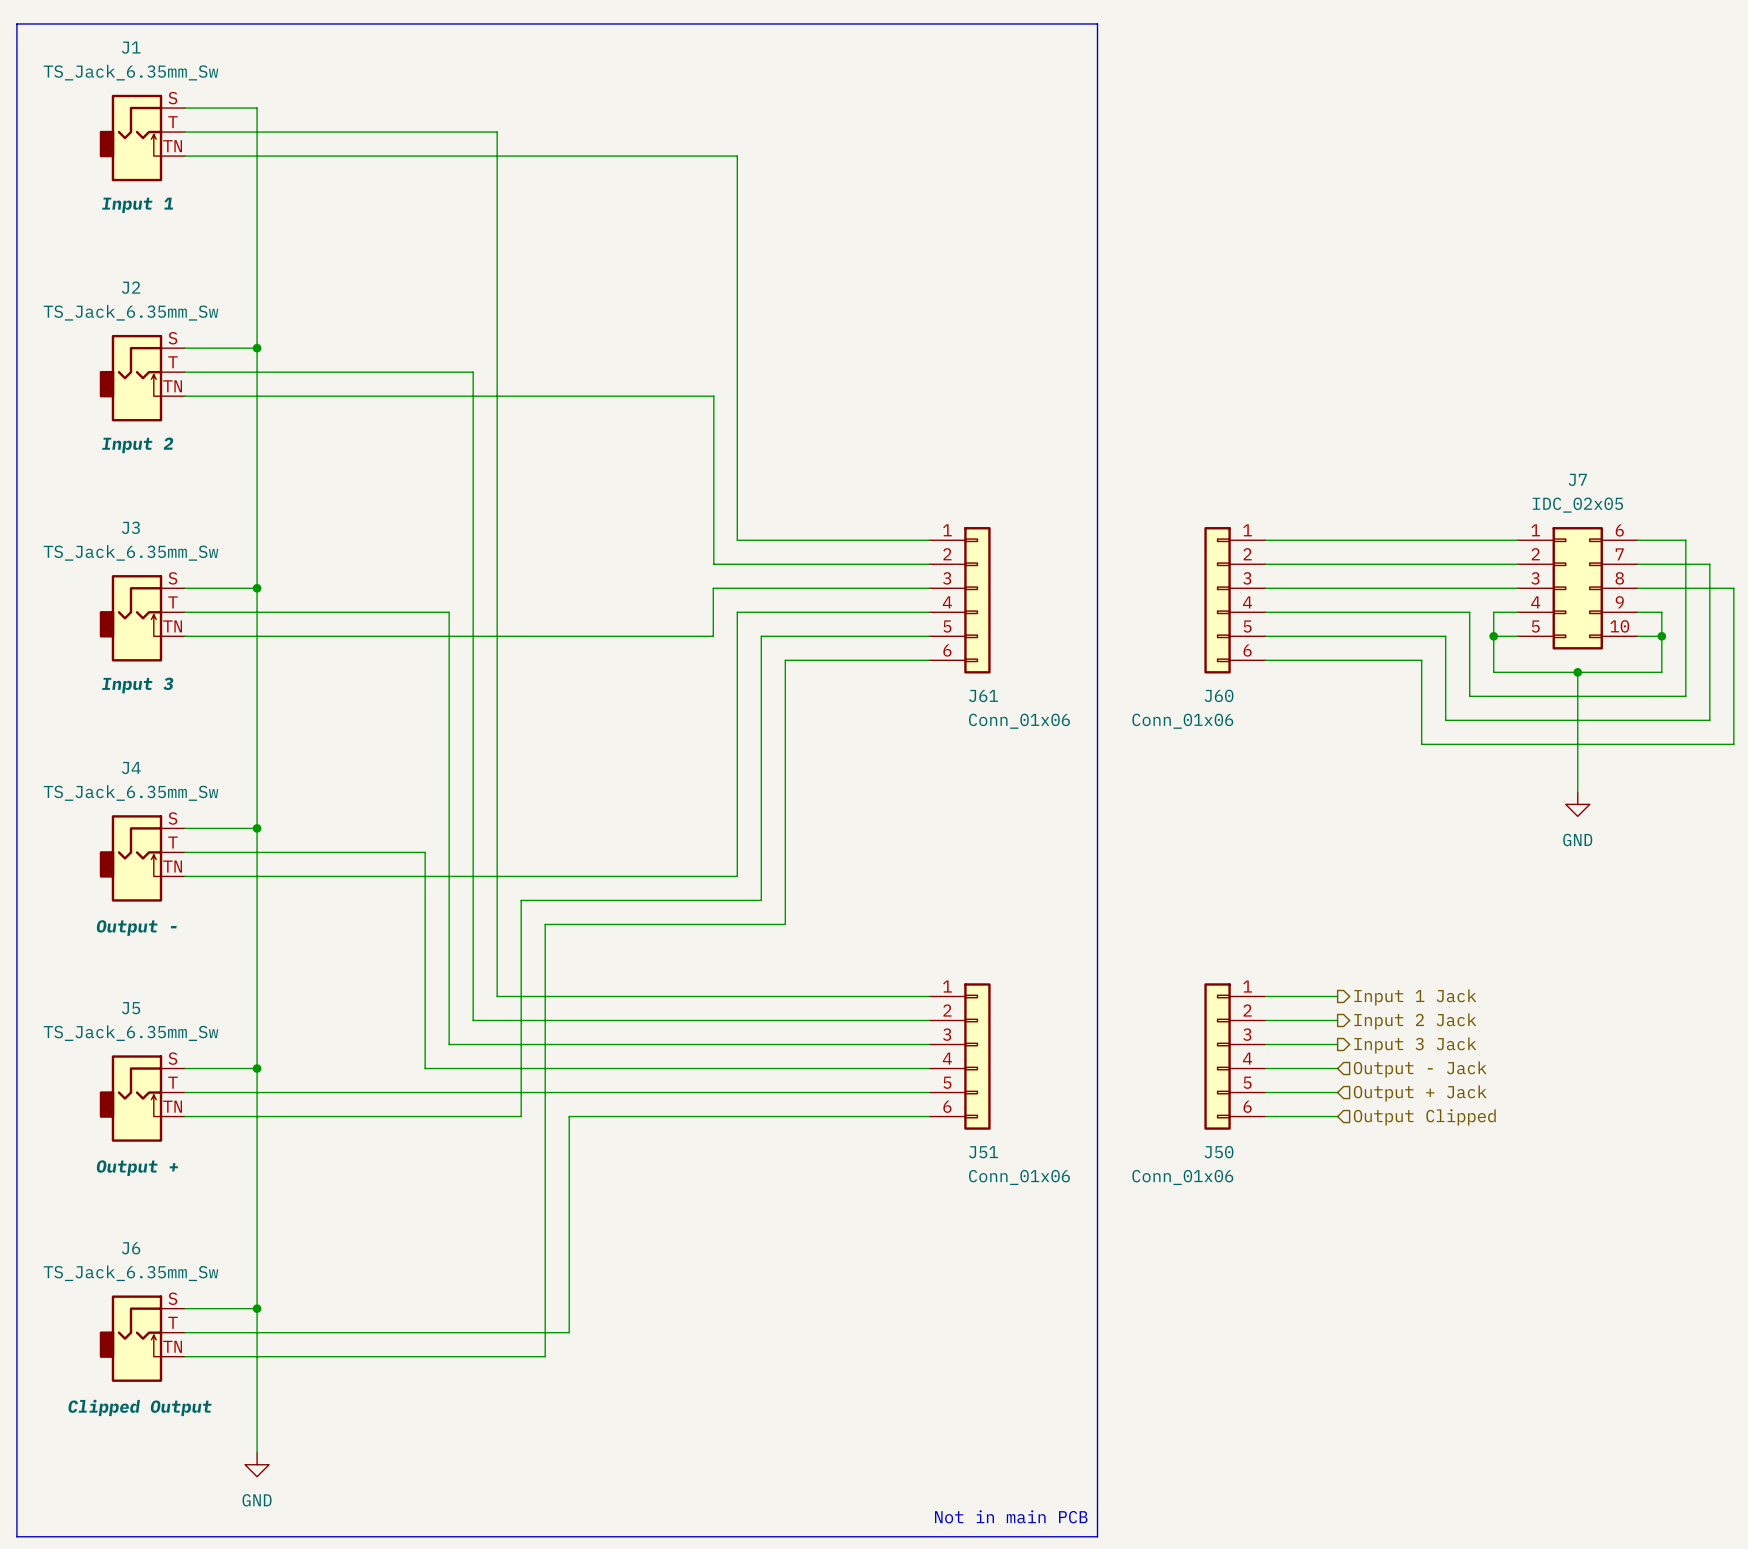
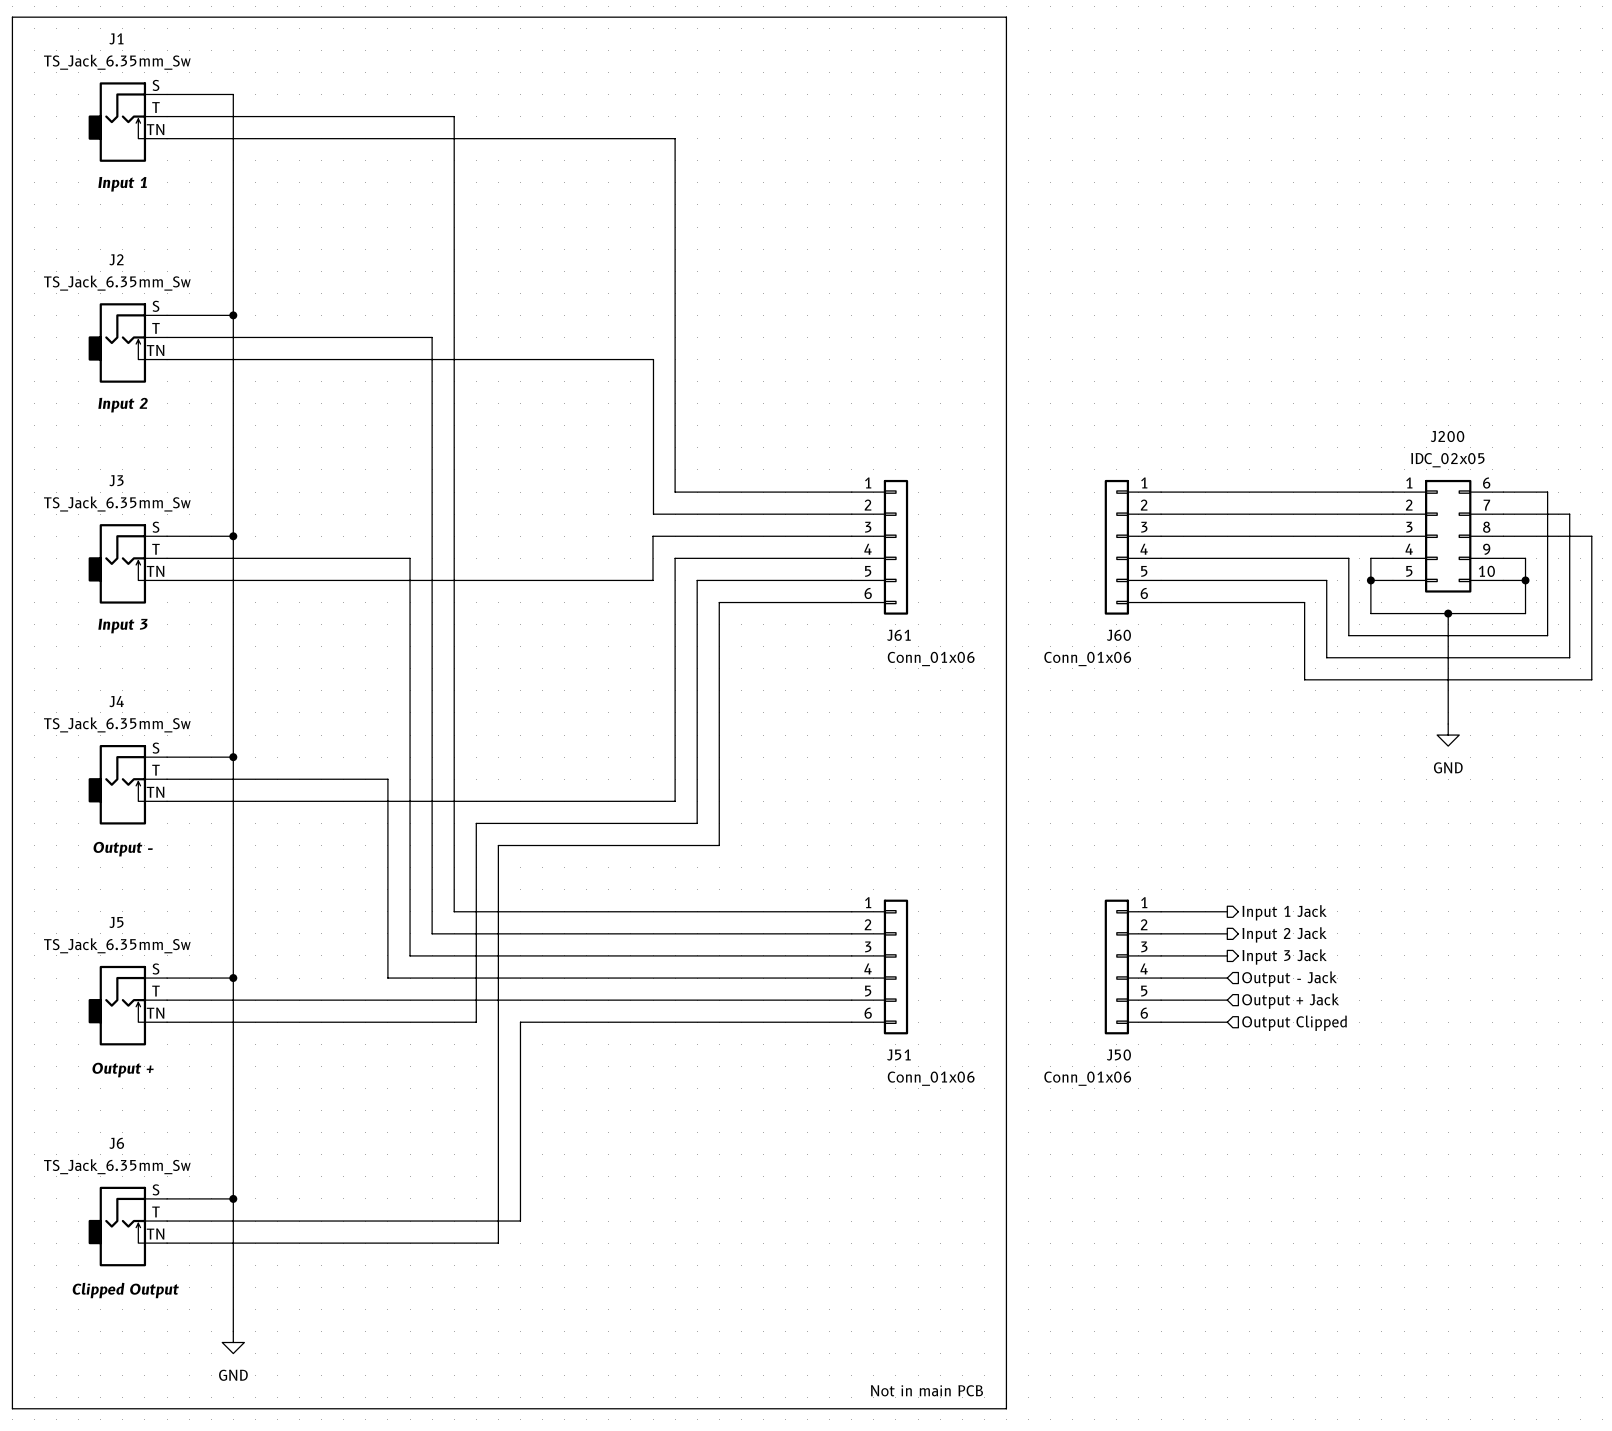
J7 name: J7 (1577, 479) -> J200 (1447, 436)

